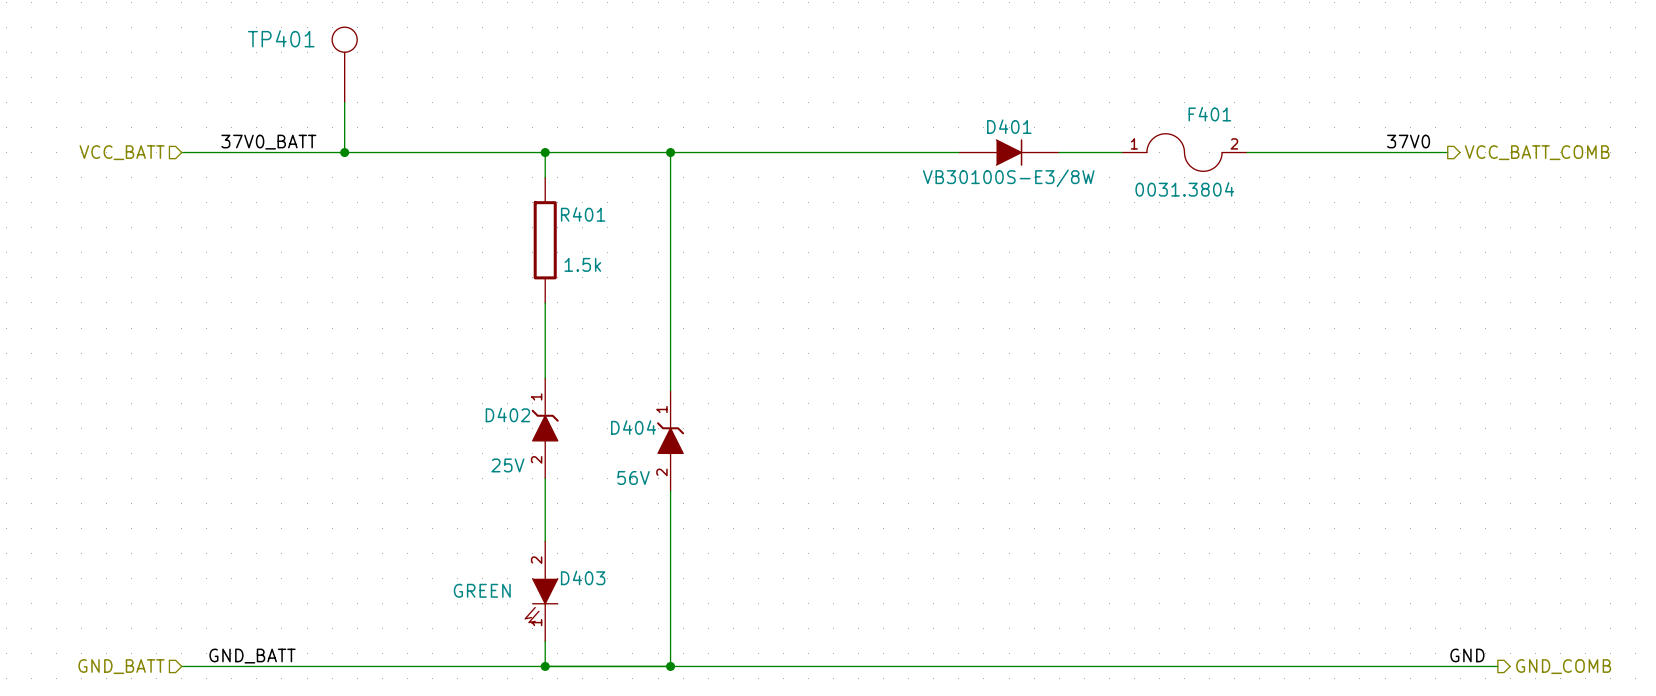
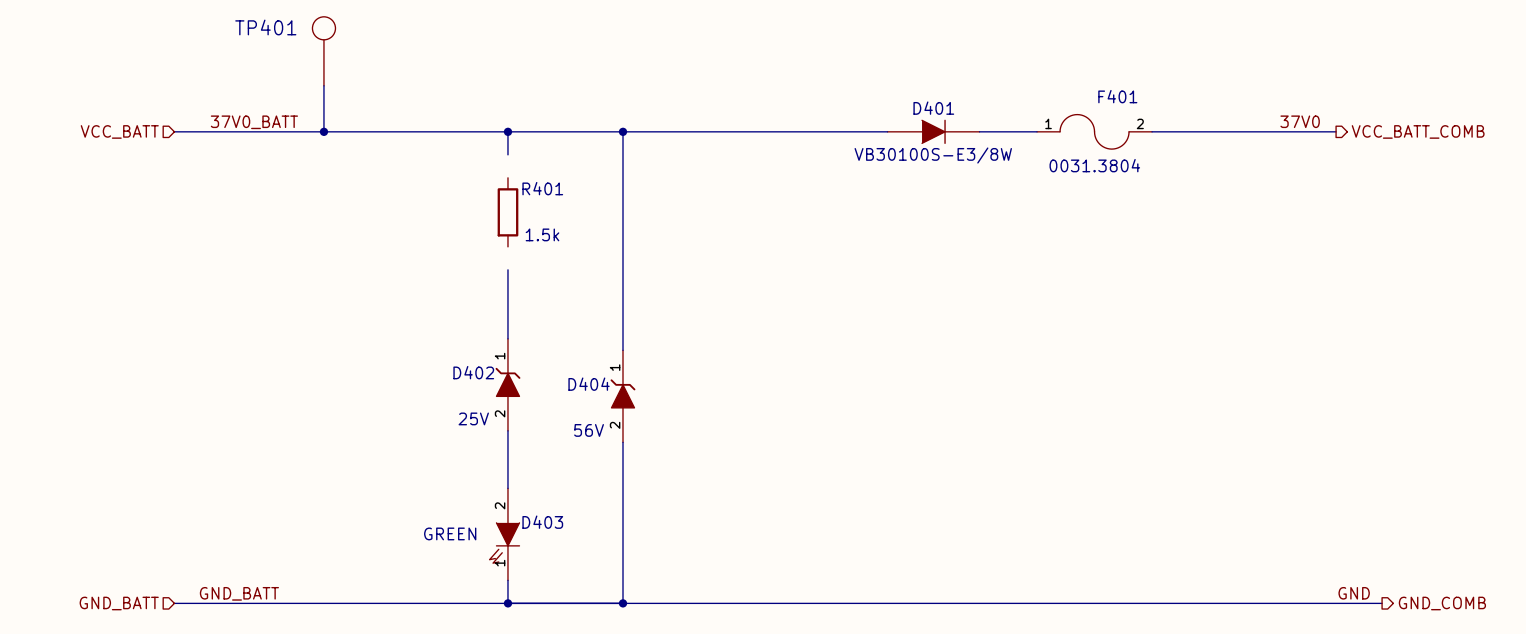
R401 symbol: [533, 177, 557, 303] -> [497, 177, 519, 247]

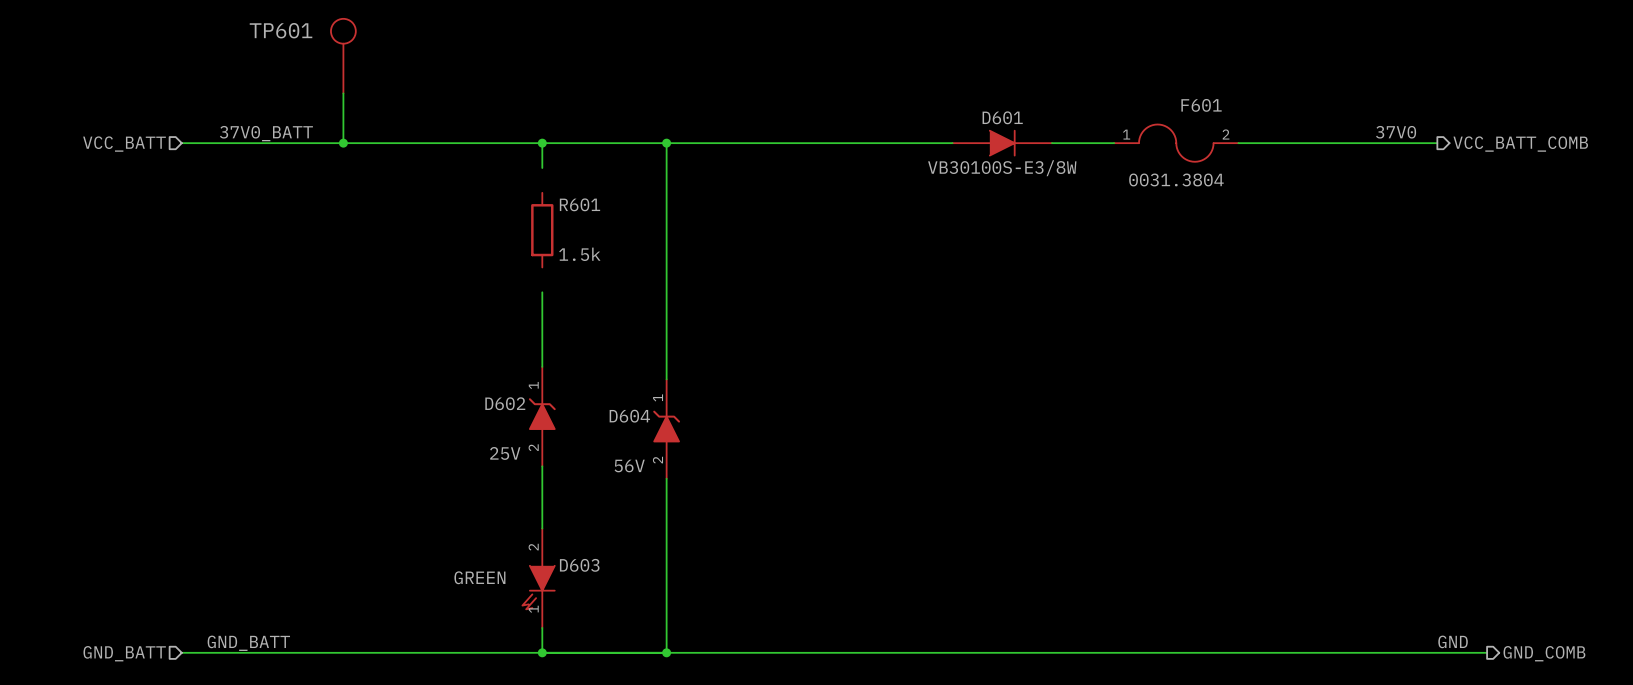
TP401 name: TP401 (265, 27) -> TP601 (281, 30)
F401 name: F401 (1117, 96) -> F601 (1201, 105)
D401 name: D401 (933, 108) -> D601 (1002, 117)
R401 name: R401 (542, 188) -> R601 (579, 204)
D402 name: D402 (473, 372) -> D602 (505, 403)
D404 name: D404 (589, 384) -> D604 (629, 416)
D403 name: D403 (542, 522) -> D603 (579, 565)

